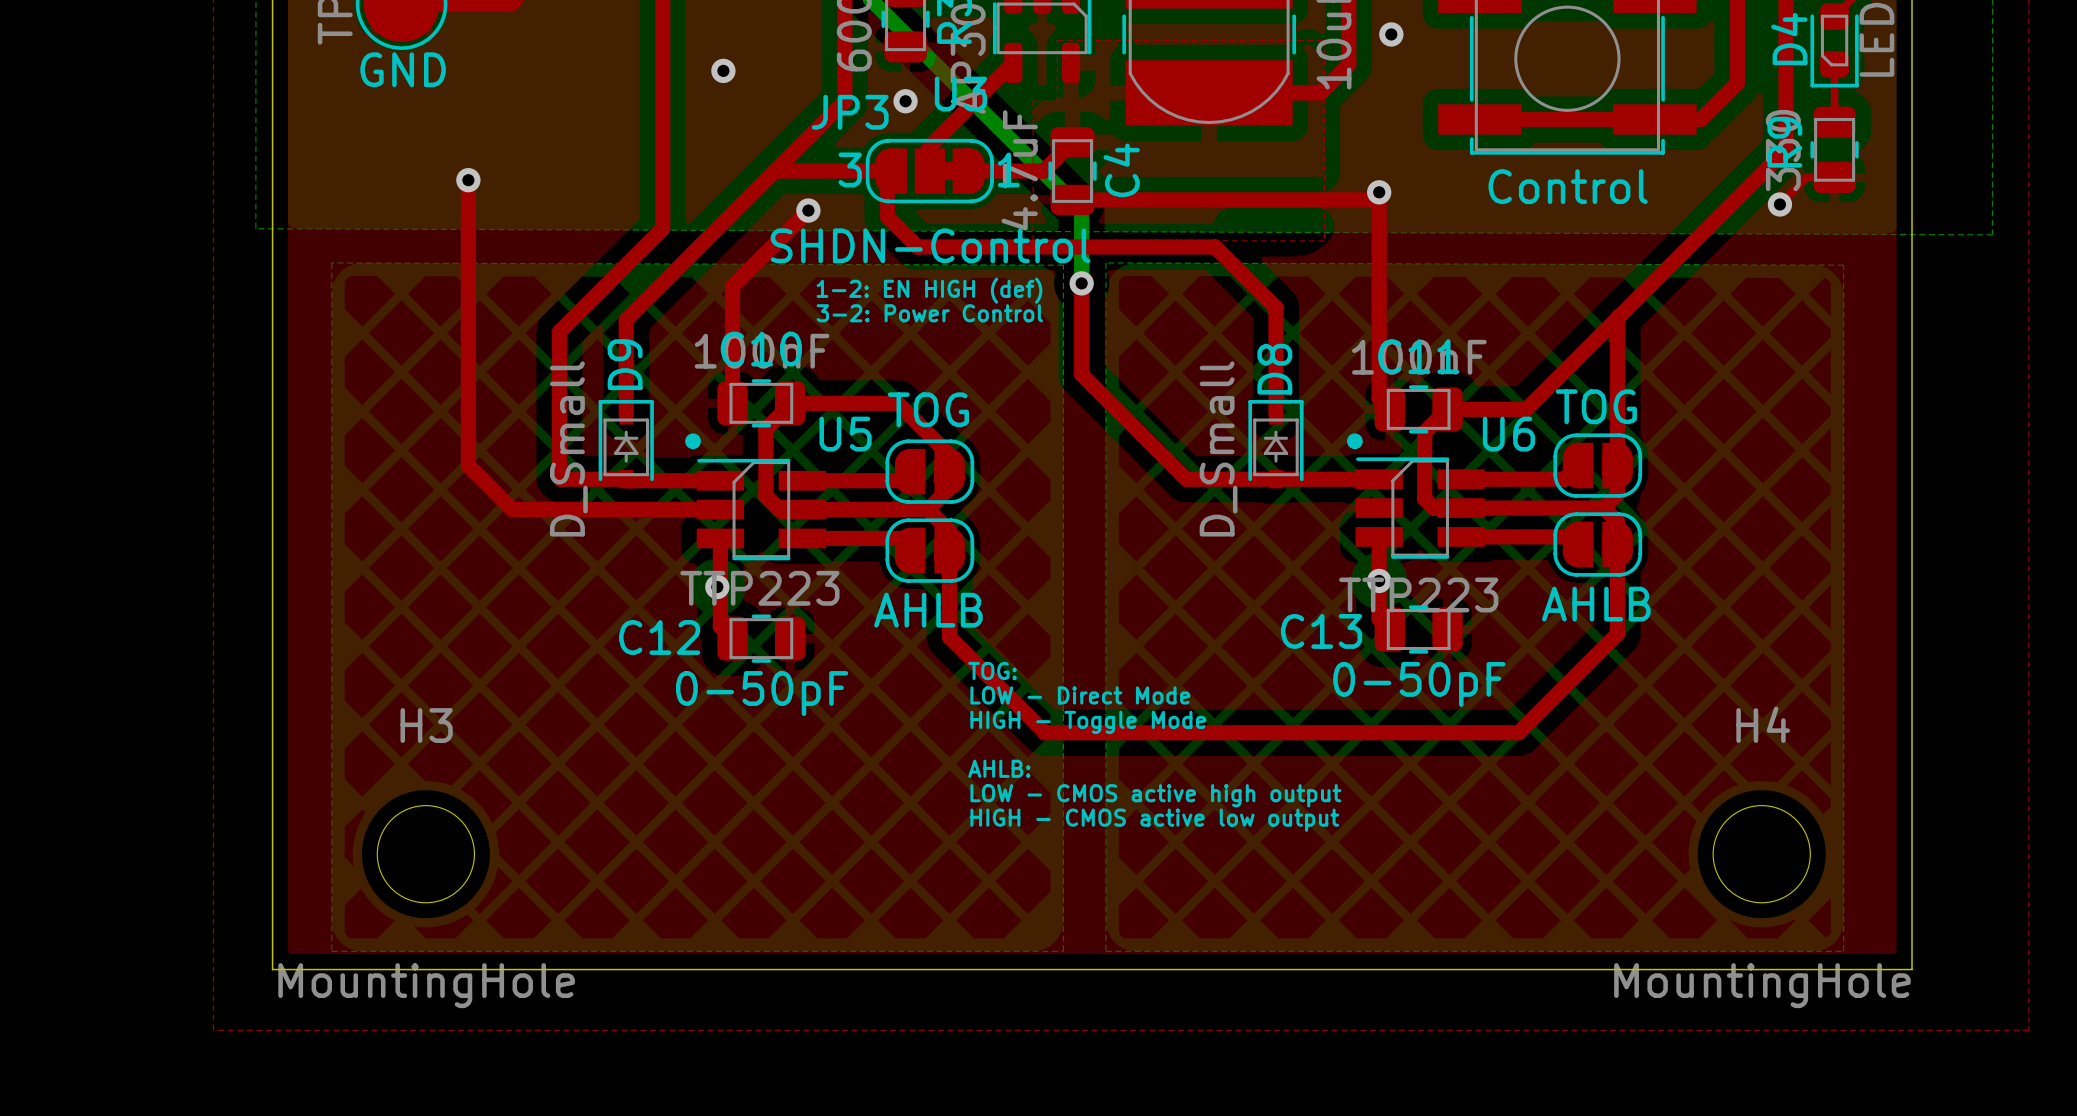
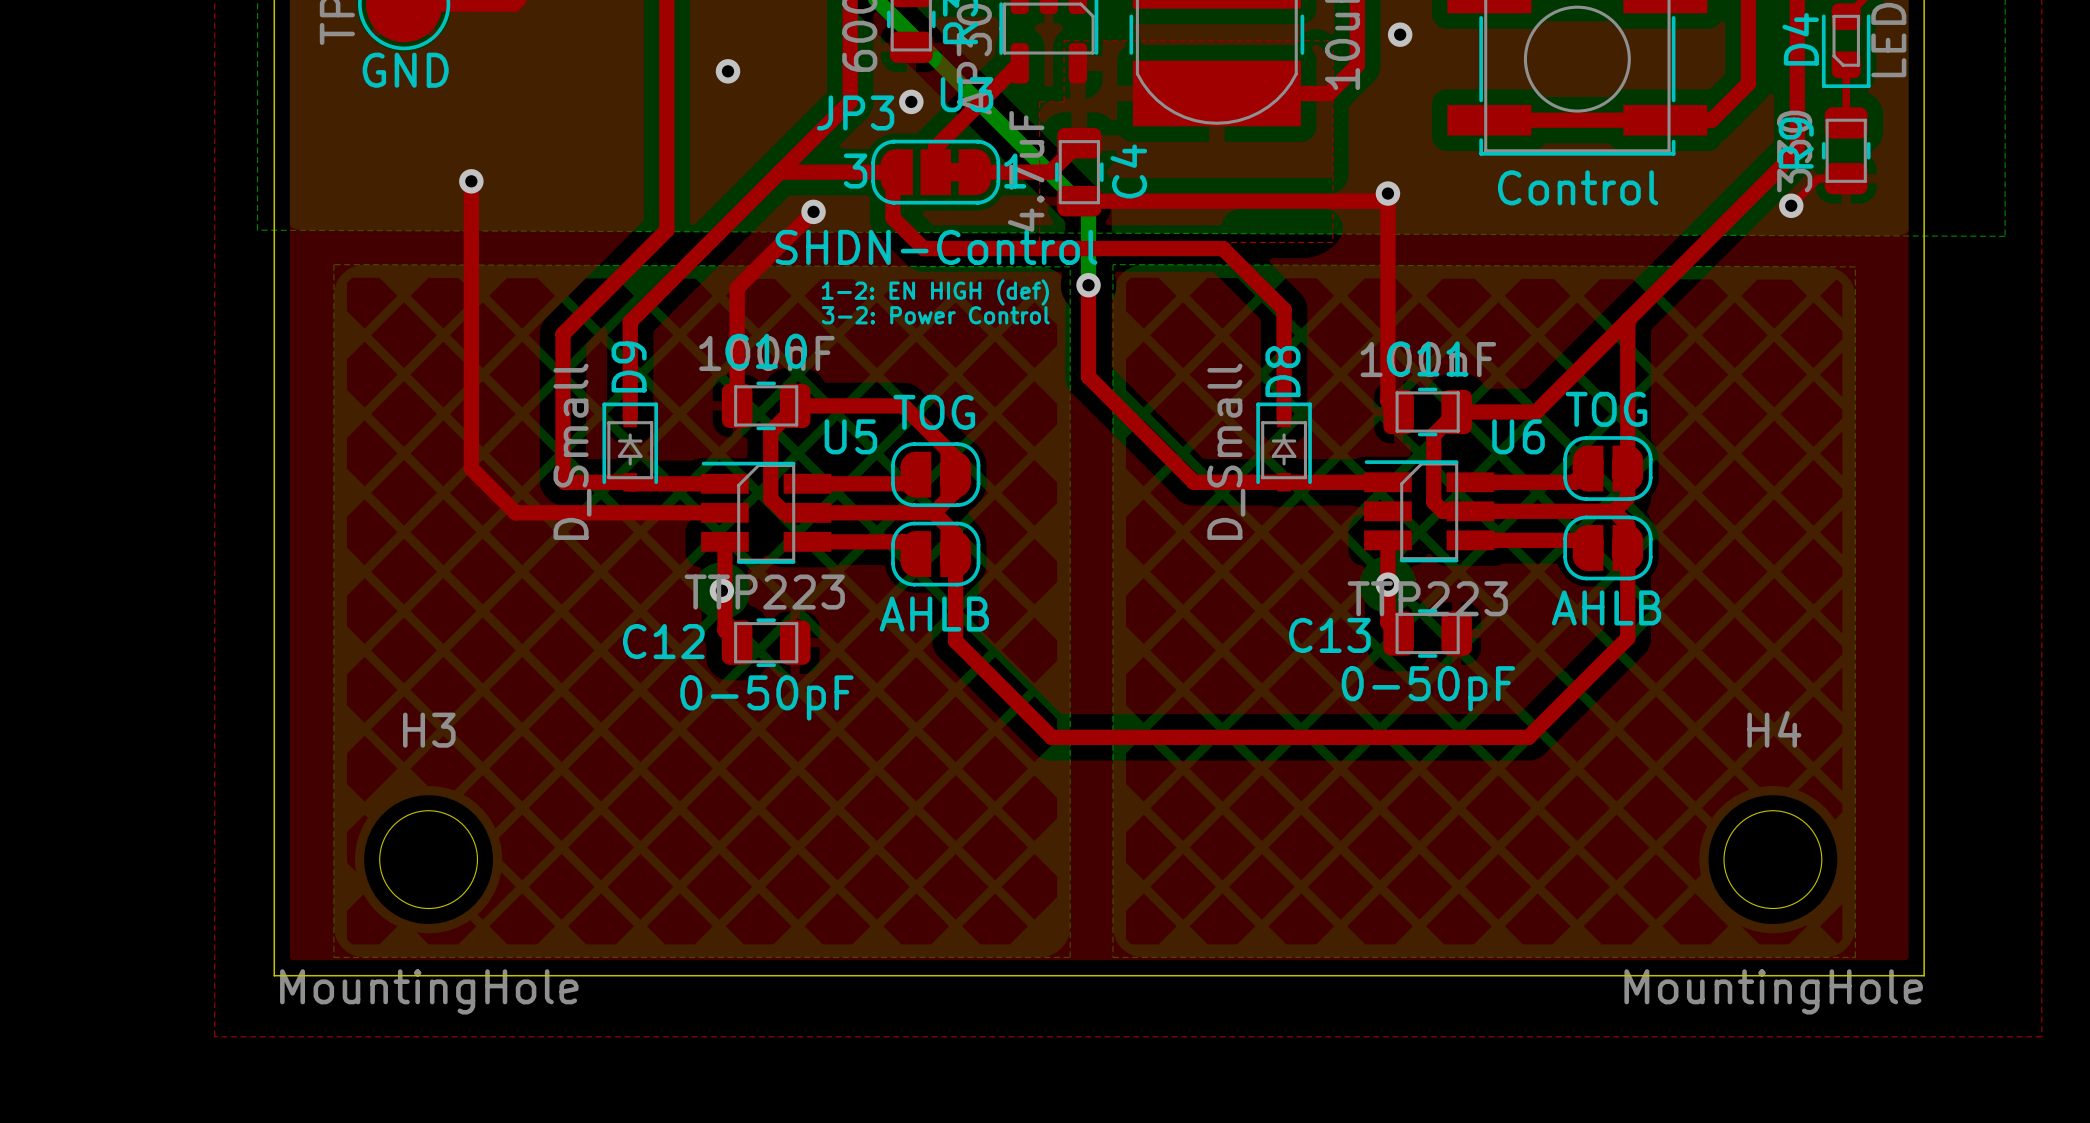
drawing: [685, 433, 701, 450] -> none
drawing: [1347, 433, 1363, 450] -> none
text: TOG: (992, 671) -> none
text: LOW - Direct Mode (1080, 695) -> none
text: HIGH - Toggle Mode (1088, 722) -> none
text: AHLB: (999, 768) -> none
text: LOW - CMOS active high output (1155, 795) -> none
text: HIGH - CMOS active low output (1154, 820) -> none

